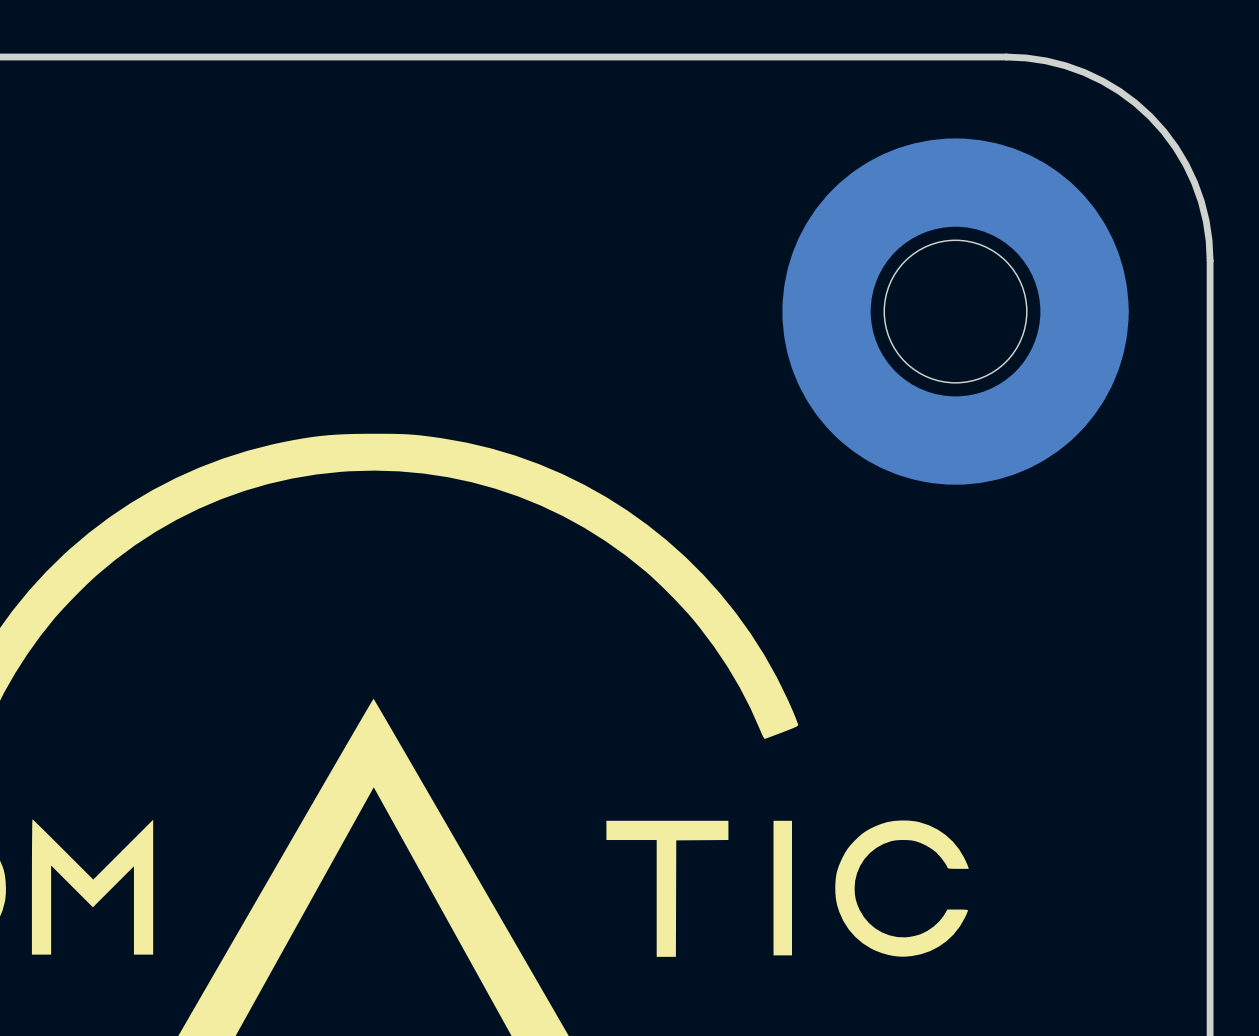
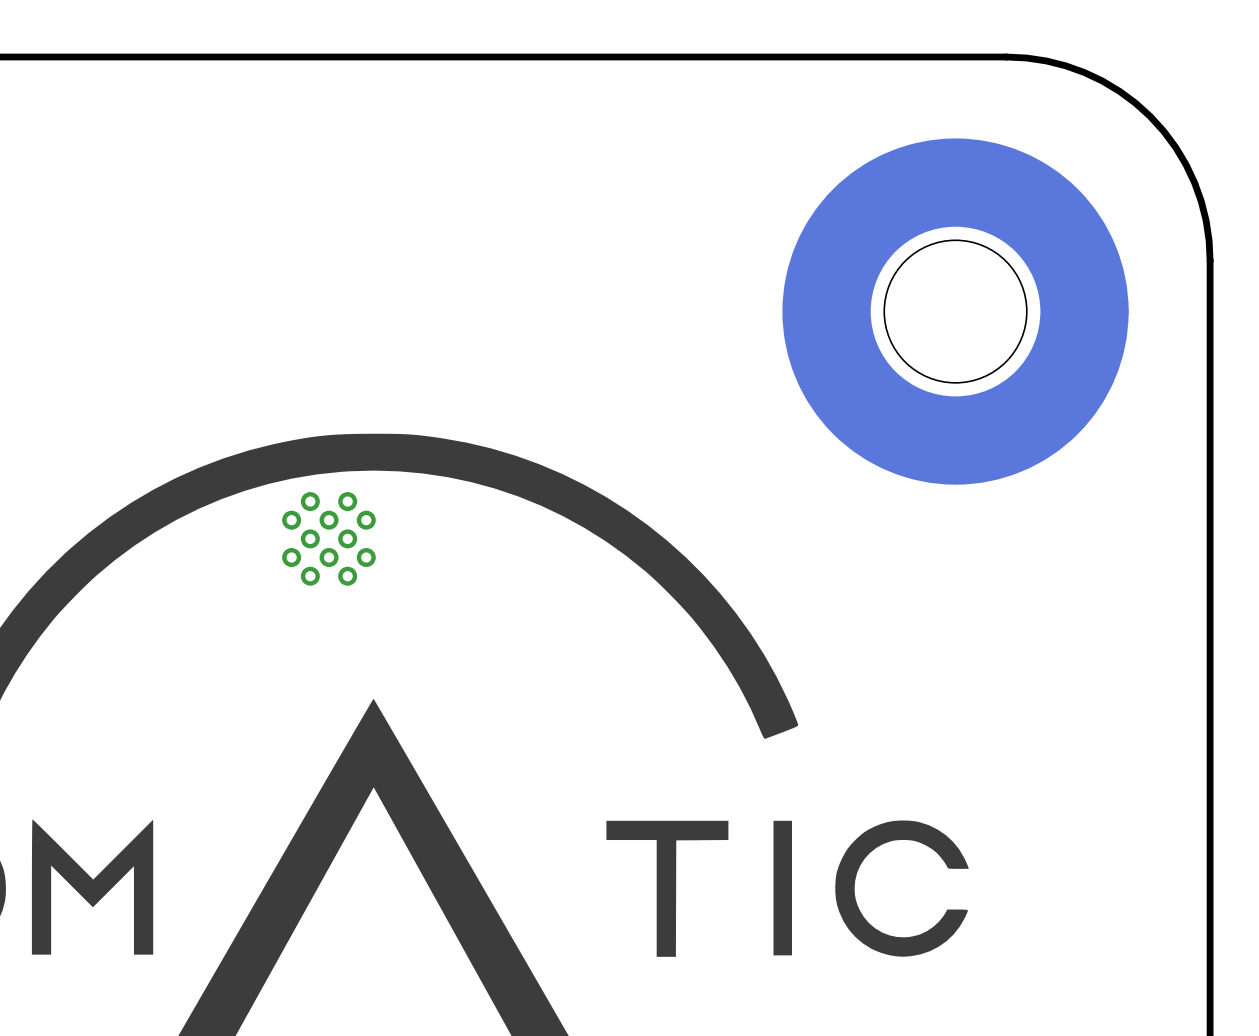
part: none -> (328, 538)

